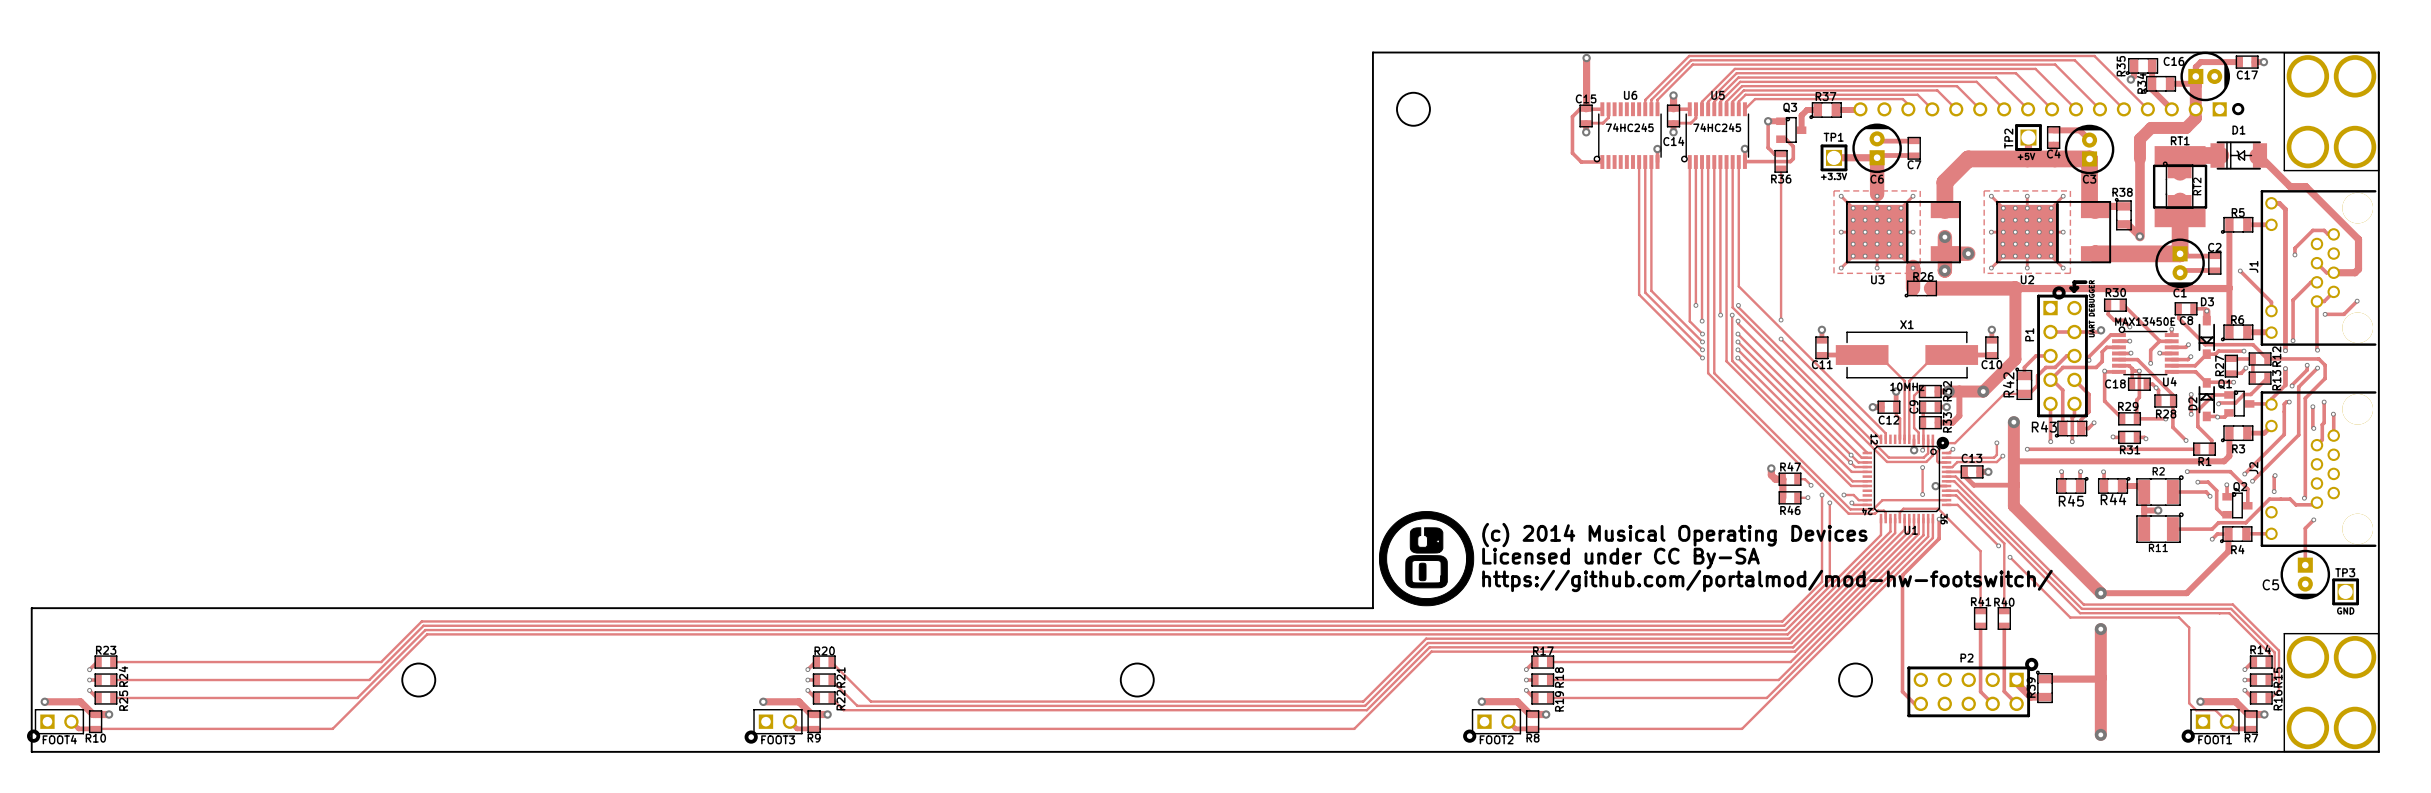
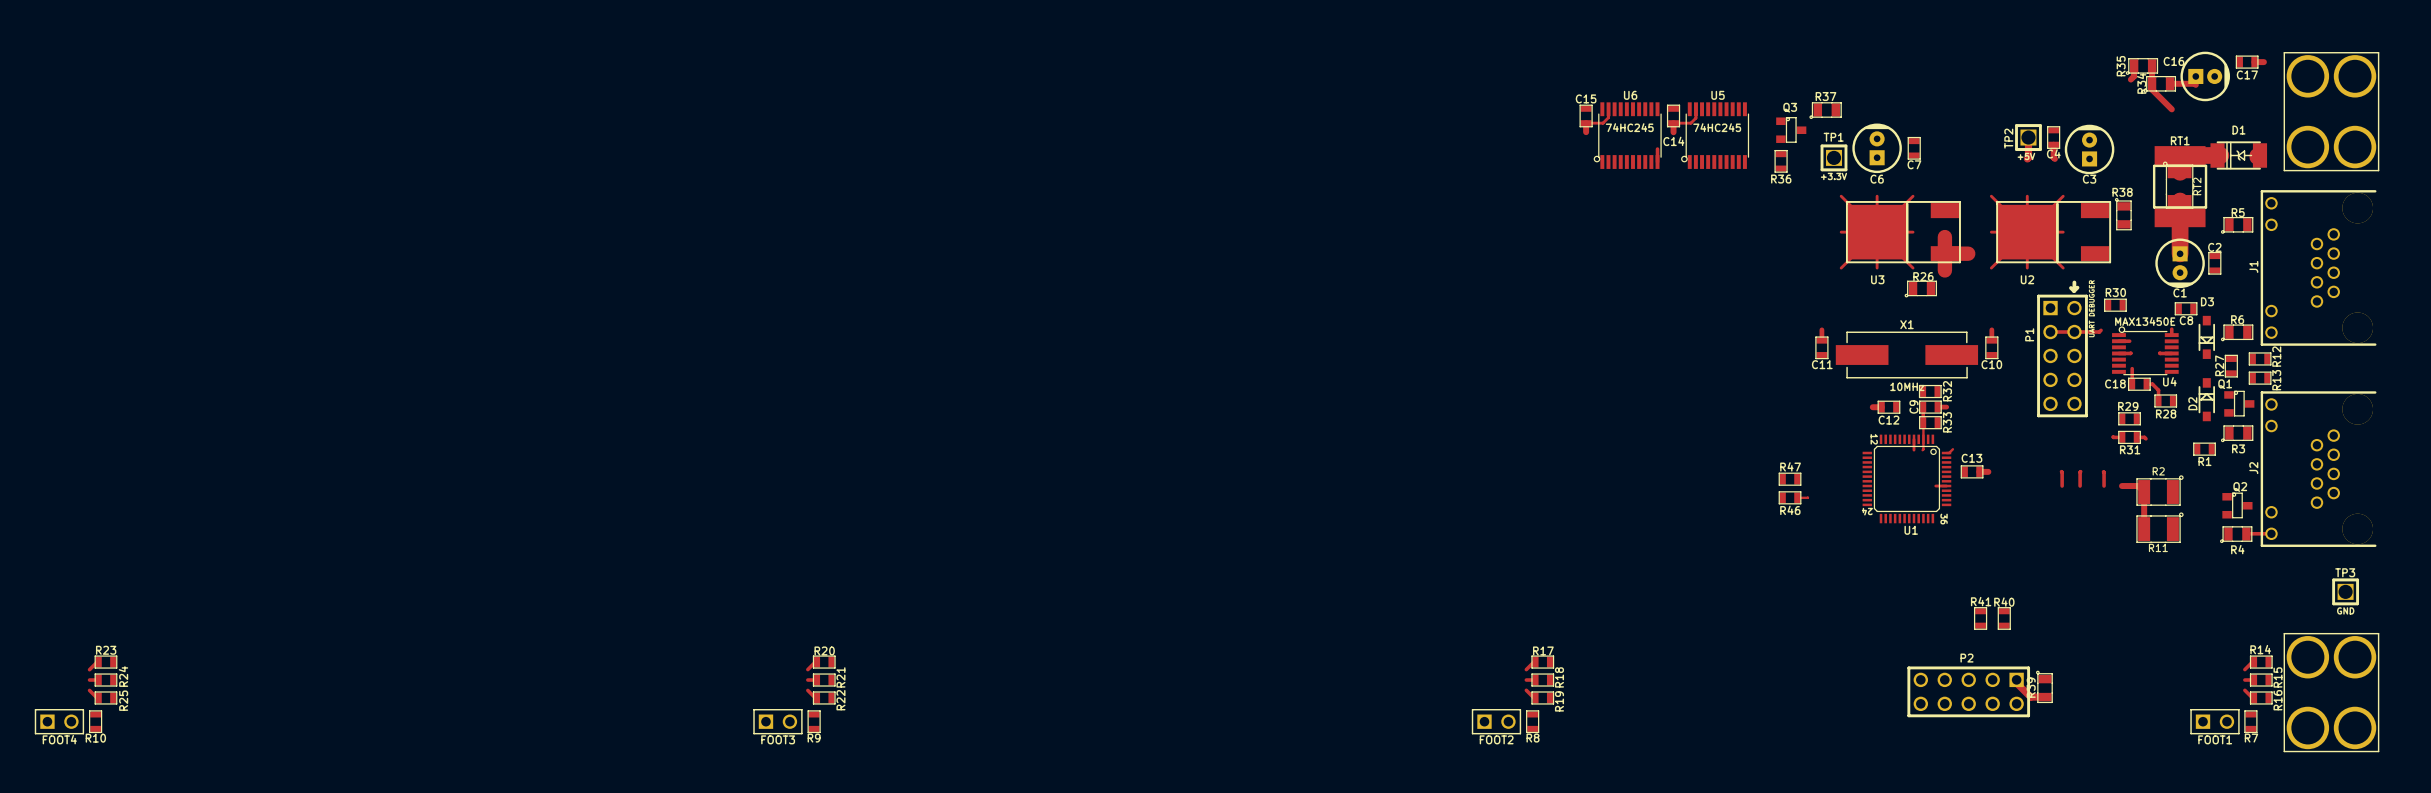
board edge: (1372, 52) (1372, 608) (31, 608) (31, 751) (2378, 751) (2378, 52) (1372, 52) -> none
track: (1586, 58) (1586, 108) -> none
via: (1586, 58) -> none
track: (2239, 62) (2200, 62) (2195, 67) (2195, 109) -> none
via: (2263, 62) -> none
via: (2130, 79) -> none
round board edge: [1396, 91, 1431, 127] -> none
track: (1673, 95) (1673, 109) (1689, 109) -> none
via: (1673, 95) -> none
drawing: [2232, 102, 2245, 116] -> none
track: (1586, 108) (1580, 108) (1572, 116) (1572, 153) (1581, 162) (1602, 162) -> none
track: (1586, 108) (1602, 109) -> none
track: (1645, 109) (1645, 99) (1689, 55) (2094, 55) (2147, 109) -> none
track: (1651, 109) (1651, 99) (1691, 60) (2074, 60) (2123, 109) -> none
track: (1657, 109) (1657, 99) (1692, 64) (2055, 64) (2099, 109) -> none
track: (1702, 109) (1702, 101) (1734, 68) (2035, 68) (2076, 109) -> none
track: (1708, 109) (1708, 101) (1736, 73) (2015, 73) (2052, 109) -> none
track: (1714, 109) (1714, 101) (1738, 77) (1996, 77) (2028, 109) -> none
track: (1720, 109) (1720, 101) (1740, 81) (1976, 81) (2004, 109) -> none
track: (1726, 109) (1726, 101) (1742, 86) (1957, 86) (1980, 109) -> none
track: (1732, 109) (1732, 101) (1743, 90) (1937, 90) (1956, 109) -> none
track: (1738, 109) (1738, 101) (1745, 94) (1917, 94) (1932, 109) -> none
track: (1744, 109) (1755, 99) (1902, 99) (1908, 104) (1908, 109) -> none
track: (1817, 109) (1807, 109) (1801, 115) (1801, 130) -> none
track: (1860, 109) (1835, 109) -> none
part: (2040, 109) -> none
track: (2195, 109) (2195, 118) (2186, 127) (2151, 127) (2139, 139) (2139, 236) (2127, 224) (2123, 224) -> none
via: (1768, 121) -> none
track: (1780, 121) (1768, 121) (1768, 147) (1774, 154) (1781, 154) -> none
track: (2053, 130) (2079, 130) (2089, 140) -> none
via: (1586, 132) -> none
via: (1673, 132) -> none
track: (1877, 138) (1879, 141) (1914, 141) -> none
track: (1781, 139) (1786, 139) (1793, 146) (1793, 158) (1790, 161) (1744, 162) (1744, 148) -> none
via: (1744, 148) -> none
via: (1657, 149) -> none
track: (1914, 155) (1879, 155) (1877, 157) -> none
track: (2259, 155) (2290, 186) (2305, 186) (2358, 239) (2358, 269) (2355, 272) (2326, 272) (2316, 263) -> none
track: (1877, 157) (1834, 157) -> none
track: (1877, 157) (1877, 194) -> none
track: (2089, 158) (1968, 158) (1944, 182) (1944, 210) -> none
track: (2089, 158) (2089, 205) (2095, 210) (2099, 206) (2123, 206) -> none
track: (1639, 162) (1639, 294) (1702, 358) -> none
track: (1645, 162) (1645, 292) (1702, 349) -> none
track: (1651, 162) (1651, 290) (1702, 341) -> none
track: (1689, 162) (1689, 321) (1702, 334) -> none
track: (1695, 162) (1695, 305) -> none
track: (1702, 162) (1702, 321) -> none
track: (1708, 162) (1708, 373) (1848, 513) (1875, 513) (1878, 510) (1883, 510) (1885, 518) -> none
track: (1714, 162) (1714, 373) (1850, 509) (1873, 509) (1882, 500) (1946, 500) -> none
track: (1720, 162) (1720, 315) -> none
track: (1726, 162) (1726, 361) (1851, 486) (1867, 486) -> none
track: (1732, 162) (1732, 307) (1887, 461) (1926, 461) (1932, 455) (1932, 439) -> none
track: (1738, 162) (1738, 286) (1885, 433) (1885, 439) -> none
track: (1781, 168) (1781, 320) -> none
zone outline: (1834, 190) (1920, 190) (1920, 273) (1834, 273) (1834, 190) -> none
zone outline: (1984, 190) (1984, 273) (2070, 273) (2070, 190) (1984, 190) -> none
via: (1841, 196) -> none
via: (1877, 196) -> none
via: (1913, 196) -> none
via: (1991, 196) -> none
via: (2027, 196) -> none
via: (2063, 196) -> none
track: (2271, 203) (2279, 203) (2285, 209) (2285, 350) -> none
via: (1853, 208) -> none
via: (1865, 208) -> none
via: (1877, 208) -> none
via: (1889, 208) -> none
via: (1901, 208) -> none
via: (2003, 208) -> none
via: (2015, 208) -> none
via: (2027, 208) -> none
via: (2039, 208) -> none
via: (2051, 208) -> none
via: (1853, 220) -> none
via: (1865, 220) -> none
via: (1877, 220) -> none
via: (1889, 220) -> none
via: (1901, 220) -> none
via: (2002, 220) -> none
via: (2015, 220) -> none
via: (2026, 220) -> none
via: (2039, 220) -> none
via: (2050, 220) -> none
track: (2229, 224) (2229, 332) -> none
track: (2247, 224) (2271, 224) -> none
via: (1841, 232) -> none
via: (1853, 232) -> none
via: (1865, 232) -> none
via: (1877, 232) -> none
via: (1889, 232) -> none
via: (1901, 232) -> none
via: (1913, 232) -> none
via: (1991, 232) -> none
via: (2003, 232) -> none
via: (2015, 232) -> none
via: (2027, 232) -> none
via: (2039, 232) -> none
via: (2051, 232) -> none
via: (2063, 232) -> none
track: (2333, 234) (2328, 234) (2324, 230) (2312, 230) (2294, 248) (2294, 254) -> none
via: (2139, 236) -> none
via: (1944, 237) -> none
via: (1853, 244) -> none
via: (1865, 244) -> none
via: (1877, 244) -> none
via: (1889, 244) -> none
via: (1901, 244) -> none
via: (2002, 244) -> none
via: (2015, 244) -> none
via: (2026, 244) -> none
via: (2039, 244) -> none
via: (2050, 244) -> none
via: (1968, 253) -> none
track: (2095, 253) (2180, 253) (2182, 256) (2214, 256) -> none
via: (2294, 254) -> none
via: (1853, 256) -> none
via: (1865, 256) -> none
via: (1877, 256) -> none
via: (1889, 256) -> none
via: (1901, 256) -> none
via: (2003, 256) -> none
via: (2015, 256) -> none
via: (2027, 256) -> none
via: (2039, 256) -> none
via: (2051, 256) -> none
track: (1913, 266) (1913, 288) -> none
via: (1841, 268) -> none
via: (1877, 268) -> none
via: (1913, 268) -> none
via: (1991, 268) -> none
via: (2027, 268) -> none
via: (2063, 268) -> none
via: (1944, 270) -> none
track: (2214, 270) (2182, 270) (2180, 272) -> none
track: (2240, 270) (2271, 302) (2271, 311) -> none
via: (2240, 270) -> none
line: (2074, 282) (2085, 282) -> none
track: (2316, 282) (2310, 282) (2293, 300) (2293, 340) -> none
drawing: [2052, 286, 2066, 300] -> none
track: (1931, 288) (2015, 288) -> none
track: (2229, 288) (2015, 288) (2015, 359) (1983, 391) (1937, 391) -> none
track: (2333, 291) (2324, 301) (2316, 301) (2317, 350) -> none
track: (2357, 301) (2343, 314) (2325, 314) -> none
via: (2357, 301) -> none
via: (1695, 305) -> none
track: (1738, 305) (1888, 457) (1923, 457) (1928, 453) (1928, 439) -> none
via: (1738, 305) -> none
track: (2108, 305) (2108, 314) (2114, 320) (2123, 320) (2129, 326) -> none
track: (2122, 305) (2159, 341) -> none
track: (2178, 308) (2178, 318) (2205, 344) (2253, 344) (2267, 358) (2318, 358) (2325, 365) (2325, 378) (2305, 398) (2304, 498) -> none
track: (2193, 308) (2205, 308) (2206, 321) -> none
via: (2206, 311) -> none
via: (2325, 314) -> none
via: (1720, 315) -> none
track: (1732, 315) (1732, 360) (1852, 481) (1867, 481) -> none
via: (1732, 315) -> none
via: (1781, 320) -> none
via: (1702, 321) -> none
track: (1738, 321) (1738, 323) (1867, 452) -> none
via: (1738, 321) -> none
via: (2129, 326) -> none
via: (1821, 329) -> none
via: (1991, 329) -> none
via: (2171, 329) -> none
via: (2101, 330) -> none
track: (2247, 332) (2271, 332) -> none
via: (1702, 334) -> none
track: (1737, 334) (1861, 457) (1867, 457) -> none
via: (1737, 334) -> none
track: (2118, 335) (2110, 335) (2089, 356) (2089, 360) -> none
track: (1781, 339) (1880, 439) -> none
via: (1781, 339) -> none
via: (2293, 340) -> none
via: (1702, 341) -> none
track: (1737, 341) (1858, 462) (1867, 462) -> none
via: (1737, 341) -> none
via: (2129, 341) -> none
track: (2171, 341) (2159, 341) (2150, 350) (2150, 363) -> none
track: (2188, 344) (2185, 347) (2171, 347) -> none
via: (2188, 344) -> none
track: (2118, 347) (2106, 347) (2102, 351) (2102, 361) (2096, 367) (2062, 367) (2050, 379) (2062, 390) (2063, 428) -> none
via: (1702, 349) -> none
track: (1737, 349) (1855, 467) (1867, 467) -> none
via: (1737, 349) -> none
via: (2285, 350) -> none
via: (2317, 350) -> none
track: (2244, 351) (2218, 351) (2215, 354) (2206, 354) (2195, 365) (2171, 365) -> none
via: (2244, 351) -> none
via: (2130, 353) -> none
via: (2159, 353) -> none
track: (1821, 355) (1878, 355) (1904, 381) (1904, 439) -> none
track: (1991, 355) (1935, 355) (1909, 381) (1909, 439) -> none
track: (2050, 355) (2035, 355) (2024, 367) (2024, 375) -> none
track: (2074, 355) (2066, 355) (2055, 367) (2045, 367) (2037, 375) (2037, 385) (2029, 393) (2004, 393) (1955, 443) (1945, 443) (1937, 451) (1937, 461) (1946, 462) -> none
track: (2190, 356) (2187, 359) (2171, 359) -> none
via: (2190, 356) -> none
via: (1702, 358) -> none
track: (1737, 358) (1851, 471) (1867, 471) -> none
via: (1737, 358) -> none
track: (2231, 358) (2252, 358) (2252, 378) -> none
track: (2118, 359) (2137, 359) (2172, 395) (2172, 427) (2186, 440) -> none
via: (2089, 360) -> none
via: (2150, 363) -> none
track: (2118, 365) (2129, 365) (2134, 371) (2139, 371) (2136, 418) (2165, 419) -> none
track: (2307, 365) (2307, 369) (2291, 385) -> none
via: (2307, 365) -> none
track: (2245, 368) (2241, 373) (2231, 373) -> none
via: (2245, 368) -> none
track: (2285, 368) (2285, 385) (2271, 399) (2271, 404) (2250, 404) -> none
via: (2285, 368) -> none
track: (2317, 368) (2298, 386) (2298, 435) (2252, 481) -> none
via: (2317, 368) -> none
via: (2104, 371) -> none
track: (2118, 371) (2104, 371) (2104, 401) (2122, 418) -> none
via: (2139, 371) -> none
track: (2171, 371) (2195, 371) (2206, 382) (2233, 382) -> none
track: (2267, 378) (2250, 394) (2244, 394) (2235, 402) (2218, 403) -> none
track: (2074, 379) (2089, 394) (2089, 411) (2081, 419) (2081, 428) (2088, 428) (2094, 422) -> none
via: (2233, 382) -> none
R42: (2023, 383) -> none
via: (2292, 386) -> none
via: (2156, 387) -> none
track: (1896, 391) (1896, 414) (1899, 418) (1899, 439) -> none
via: (1896, 391) -> none
track: (1923, 391) (1918, 391) (1914, 395) (1914, 428) (1918, 432) (1918, 439) -> none
via: (1948, 391) -> none
track: (1959, 391) (1959, 415) (1952, 422) (1937, 422) -> none
via: (1983, 391) -> none
track: (2191, 394) (2191, 414) -> none
via: (2191, 394) -> none
track: (2228, 394) (2213, 394) (2197, 410) (2197, 426) (2211, 440) (2211, 449) -> none
track: (2289, 402) (2284, 404) (2284, 434) (2244, 474) -> none
via: (2289, 402) -> none
track: (2323, 402) (2322, 439) (2316, 445) -> none
via: (2324, 402) -> none
track: (2050, 403) (2050, 441) -> none
track: (2074, 403) (2072, 441) -> none
via: (2218, 403) -> none
track: (2312, 406) (2313, 428) -> none
via: (2312, 406) -> none
via: (1872, 407) -> none
via: (1946, 407) -> none
track: (2228, 412) (2224, 417) (2206, 416) -> none
via: (2191, 414) -> none
track: (2333, 414) (2333, 435) -> none
via: (2333, 414) -> none
via: (2217, 417) -> none
via: (2165, 419) -> none
track: (2013, 422) (2013, 506) (2100, 593) -> none
via: (2013, 422) -> none
via: (2094, 422) -> none
track: (2271, 426) (2264, 433) (2247, 433) -> none
via: (2313, 428) -> none
R43: (2071, 429) -> none
track: (2229, 433) (2229, 456) (2224, 461) (2013, 460) -> none
drawing: [1936, 436, 1950, 450] -> none
via: (2113, 436) -> none
via: (2145, 438) -> none
via: (2186, 440) -> none
via: (2050, 441) -> none
via: (2072, 441) -> none
track: (1996, 442) (1996, 454) (1994, 457) (1946, 457) -> none
via: (1996, 442) -> none
via: (1952, 449) -> none
track: (2027, 449) (2197, 449) -> none
via: (2027, 449) -> none
via: (1914, 450) -> none
via: (1922, 450) -> none
via: (1851, 455) -> none
track: (2002, 456) (1996, 462) (1957, 462) (1952, 467) (1946, 467) -> none
via: (2002, 456) -> none
via: (1850, 462) -> none
track: (1922, 467) (1922, 494) -> none
via: (1922, 467) -> none
track: (1771, 468) (1771, 475) (1775, 479) (1782, 479) (1782, 497) -> none
via: (1771, 468) -> none
track: (1946, 471) (1964, 471) (1964, 476) (1973, 485) (2013, 485) -> none
via: (1988, 471) -> none
via: (2061, 471) -> none
via: (2080, 471) -> none
via: (2103, 471) -> none
track: (2187, 471) (2230, 471) (2247, 489) (2247, 505) -> none
via: (2187, 471) -> none
via: (2244, 474) -> none
track: (2275, 475) (2274, 491) -> none
via: (2275, 475) -> none
track: (1946, 476) (1955, 476) (2083, 604) (2232, 604) (2279, 650) (2279, 690) (2271, 697) (2268, 697) -> none
track: (1797, 479) (1804, 479) (1811, 485) -> none
track: (1946, 481) (1954, 481) (2081, 608) (2231, 608) (2274, 652) (2274, 678) (2268, 680) -> none
via: (2252, 481) -> none
track: (2197, 482) (2208, 482) (2216, 490) (2216, 508) (2222, 514) (2227, 514) -> none
via: (2197, 482) -> none
track: (2226, 484) (2227, 496) -> none
via: (2226, 484) -> none
via: (1811, 485) -> none
R45: (2072, 485) -> none
R44: (2114, 485) -> none
via: (1935, 486) -> none
track: (1946, 490) (1957, 490) (2080, 613) (2219, 613) -> none
via: (2274, 491) -> none
track: (2172, 492) (2206, 492) (2210, 496) -> none
via: (1922, 494) -> none
track: (1822, 495) (1822, 581) (1782, 621) (421, 621) (381, 662) (113, 662) -> none
via: (1822, 495) -> none
track: (1843, 495) (1853, 495) (1858, 500) (1867, 500) -> none
via: (1843, 495) -> none
track: (1946, 495) (1956, 495) (2004, 543) (2004, 611) -> none
via: (2210, 496) -> none
via: (1807, 497) -> none
via: (2304, 498) -> none
track: (1829, 502) (1829, 580) (1784, 625) (423, 625) (369, 680) (113, 680) -> none
via: (1829, 502) -> none
track: (1851, 502) (1853, 504) (1867, 504) -> none
via: (1851, 502) -> none
track: (2316, 502) (2314, 504) (2295, 504) (2290, 499) (2269, 499) (2245, 522) (2218, 522) (2212, 529) (2172, 529) -> none
track: (1946, 504) (1957, 504) (1998, 545) -> none
track: (2144, 510) (2158, 510) -> none
via: (2158, 510) -> none
drawing: [1379, 511, 1475, 607] -> none
track: (1880, 518) (1880, 535) (1785, 630) (425, 630) (357, 697) (113, 697) -> none
track: (1890, 518) (1890, 531) (1787, 634) (427, 634) (332, 728) (78, 728) (71, 721) -> none
track: (1895, 518) (1895, 533) (1789, 638) (1426, 638) (1363, 701) (870, 701) (831, 662) -> none
track: (1899, 518) (1899, 512) (1903, 508) (1938, 508) (1980, 551) (1980, 611) -> none
track: (1904, 518) (1904, 529) (1791, 643) (1427, 643) (1365, 705) (857, 705) (831, 680) -> none
track: (1909, 518) (1909, 531) (1793, 647) (1429, 647) (1366, 710) (843, 710) (831, 697) -> none
track: (1914, 518) (1914, 532) (1794, 651) (1431, 651) (1354, 728) (797, 728) (789, 721) -> none
track: (1918, 518) (1918, 533) (1790, 662) (1549, 662) -> none
track: (1923, 518) (1923, 535) (1778, 680) (1549, 680) -> none
track: (1928, 518) (1928, 536) (1766, 697) (1549, 697) -> none
track: (1932, 518) (1932, 538) (1742, 728) (1515, 728) (1508, 721) -> none
track: (1939, 519) (1939, 538) (1902, 575) (1902, 691) (1914, 703) (1920, 703) -> none
via: (1939, 519) -> none
track: (2313, 519) (2305, 528) (2305, 565) -> none
via: (2313, 519) -> none
text: (c) 2014 Musical Operating Devices (1674, 535) -> none
track: (2212, 539) (2217, 534) (2228, 534) (2228, 551) (2186, 593) (2100, 593) -> none
via: (2212, 539) -> none
via: (1998, 545) -> none
track: (2010, 557) (2070, 617) (2179, 617) (2189, 627) (2189, 703) (2196, 710) (2215, 710) (2234, 728) (2250, 728) -> none
via: (2010, 557) -> none
text: Licensed under CC By-SA (1620, 558) -> none
C5: (2305, 574) -> none
text: https://github.com/portalmod/mod-hw-footswitch/ (1767, 580) -> none
via: (2100, 593) -> none
track: (2219, 613) (2229, 613) (2269, 653) (2269, 662) (2268, 658) -> none
track: (1980, 625) (1980, 691) (1992, 703) -> none
track: (2004, 625) (2004, 691) (2016, 703) -> none
track: (2100, 629) (2100, 734) -> none
via: (2100, 629) -> none
drawing: [2025, 657, 2039, 672] -> none
round board edge: [401, 662, 437, 698] -> none
round board edge: [1119, 662, 1155, 698] -> none
round board edge: [1838, 662, 1874, 698] -> none
via: (89, 669) -> none
via: (807, 669) -> none
via: (1526, 669) -> none
via: (2244, 669) -> none
track: (2100, 677) (2045, 679) -> none
via: (89, 680) -> none
via: (807, 680) -> none
via: (1526, 680) -> none
via: (2244, 680) -> none
via: (89, 690) -> none
via: (807, 690) -> none
via: (1526, 690) -> none
via: (2244, 690) -> none
track: (44, 701) (80, 701) (93, 714) (109, 714) -> none
via: (44, 701) -> none
track: (763, 701) (798, 701) (811, 714) (827, 714) -> none
via: (763, 701) -> none
track: (1481, 701) (1517, 701) (1530, 714) (1546, 714) -> none
via: (1481, 701) -> none
track: (2200, 701) (2235, 701) (2248, 714) (2264, 714) -> none
via: (2200, 701) -> none
via: (109, 714) -> none
via: (827, 714) -> none
via: (1546, 714) -> none
via: (2264, 714) -> none
drawing: [27, 729, 41, 743] -> none
drawing: [1463, 729, 1477, 743] -> none
drawing: [2181, 729, 2195, 743] -> none
drawing: [744, 730, 758, 744] -> none
via: (2100, 734) -> none

